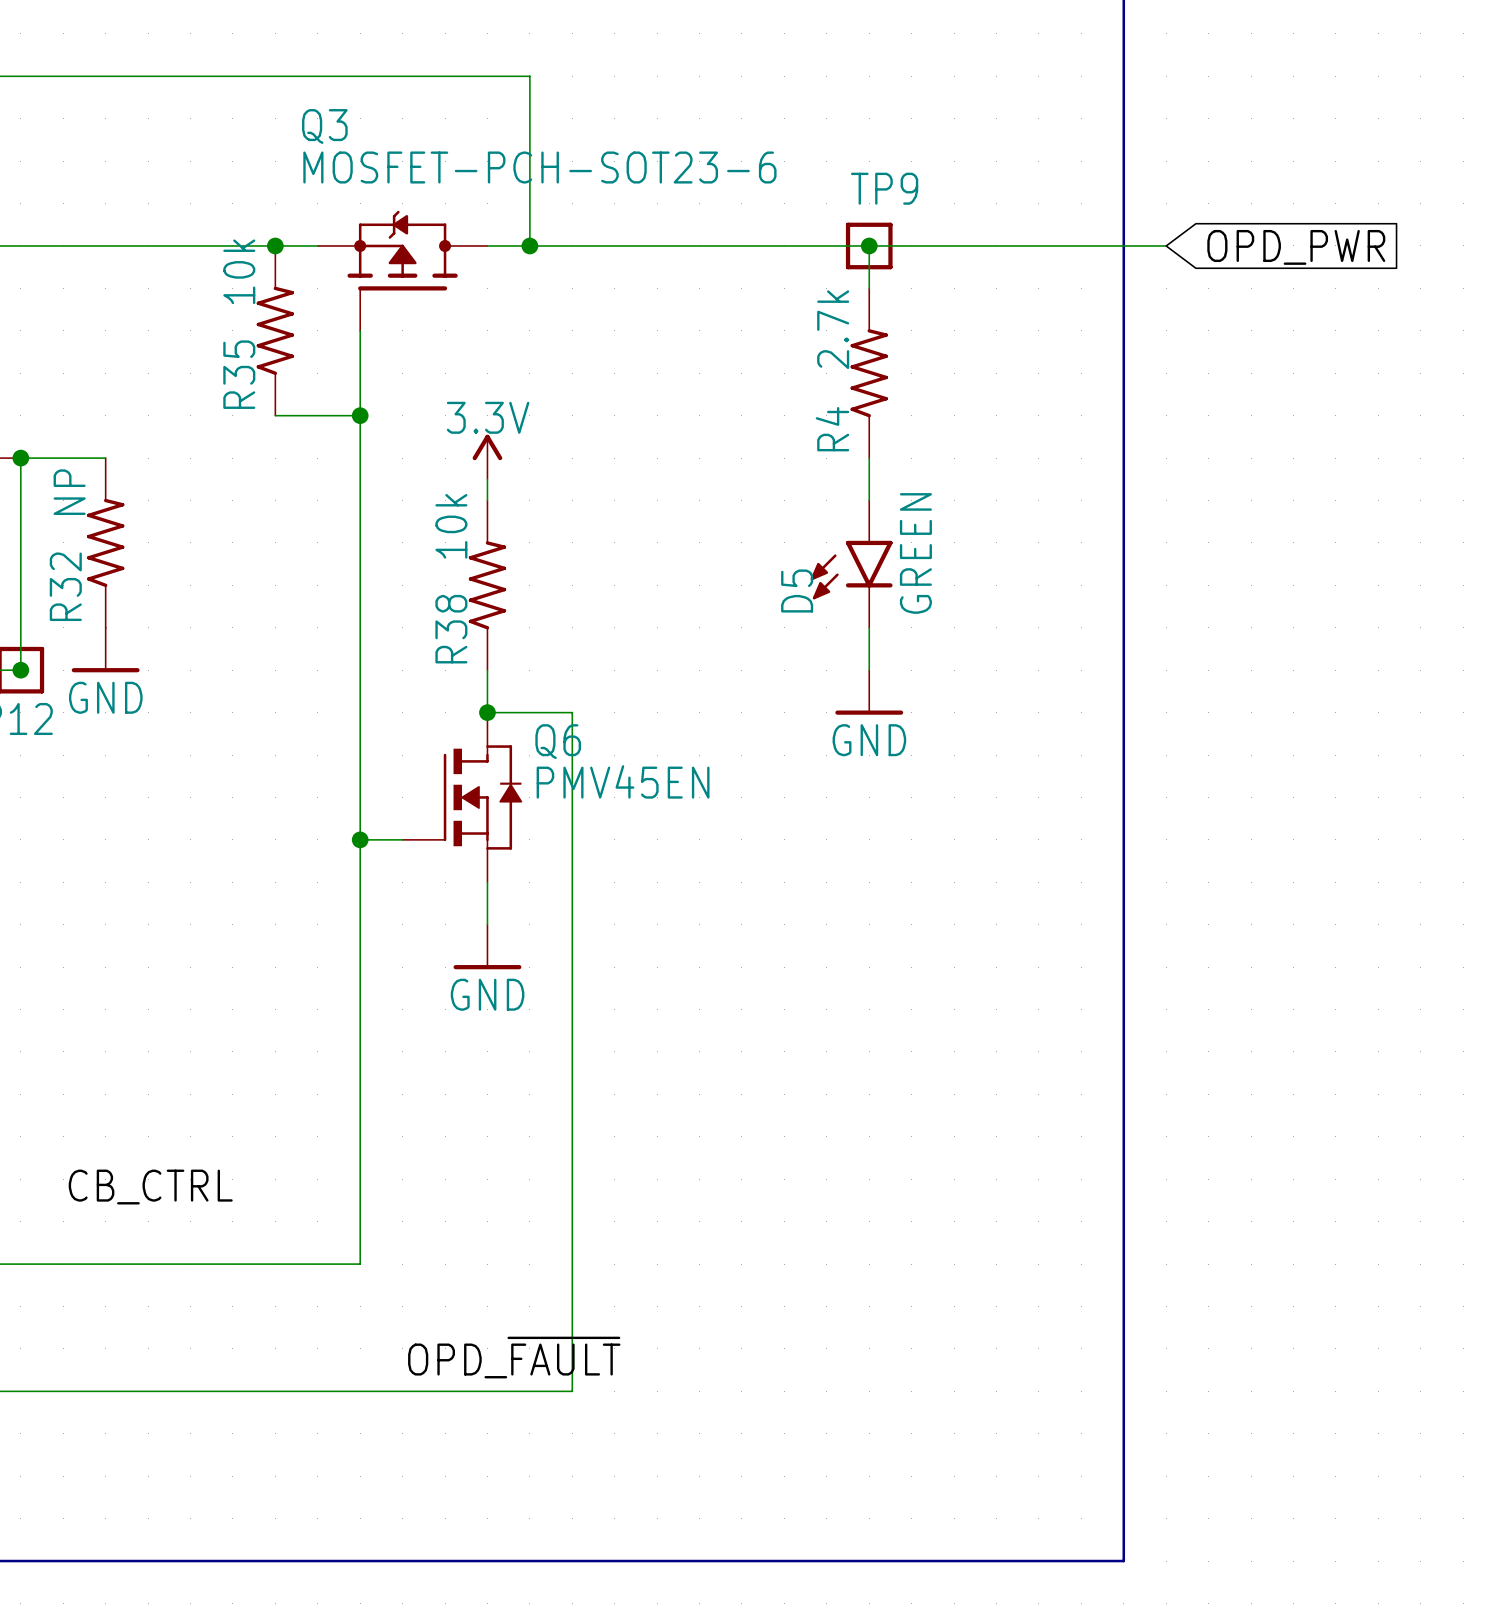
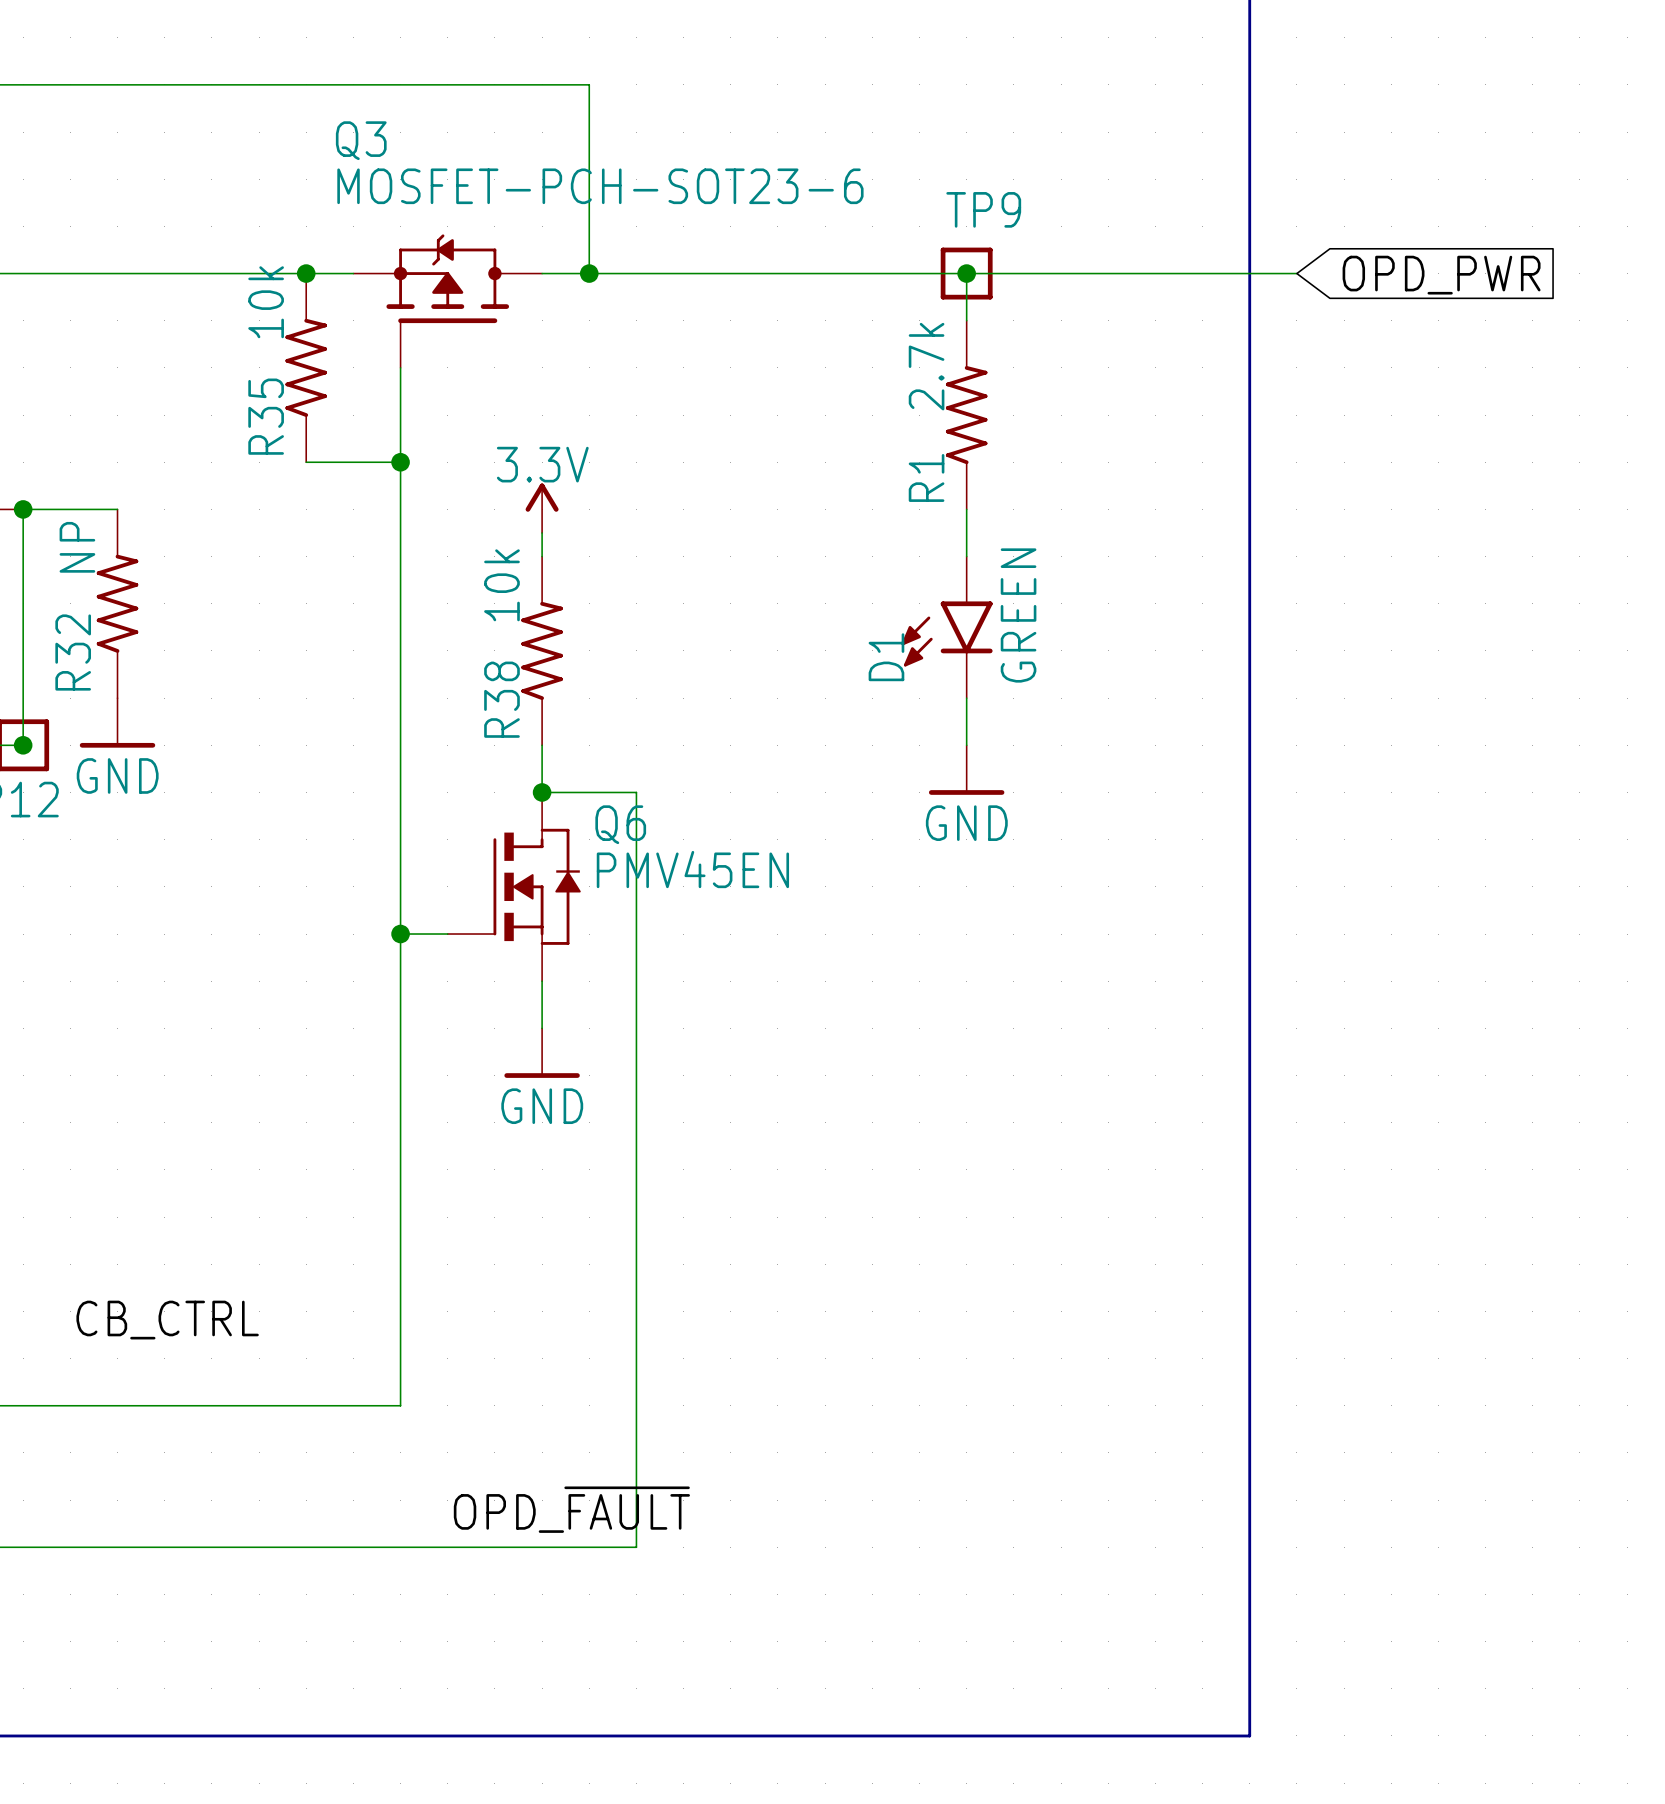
R4 name: R4 (832, 429) -> R1 (926, 477)
D5 name: D5 (797, 591) -> D1 (886, 657)

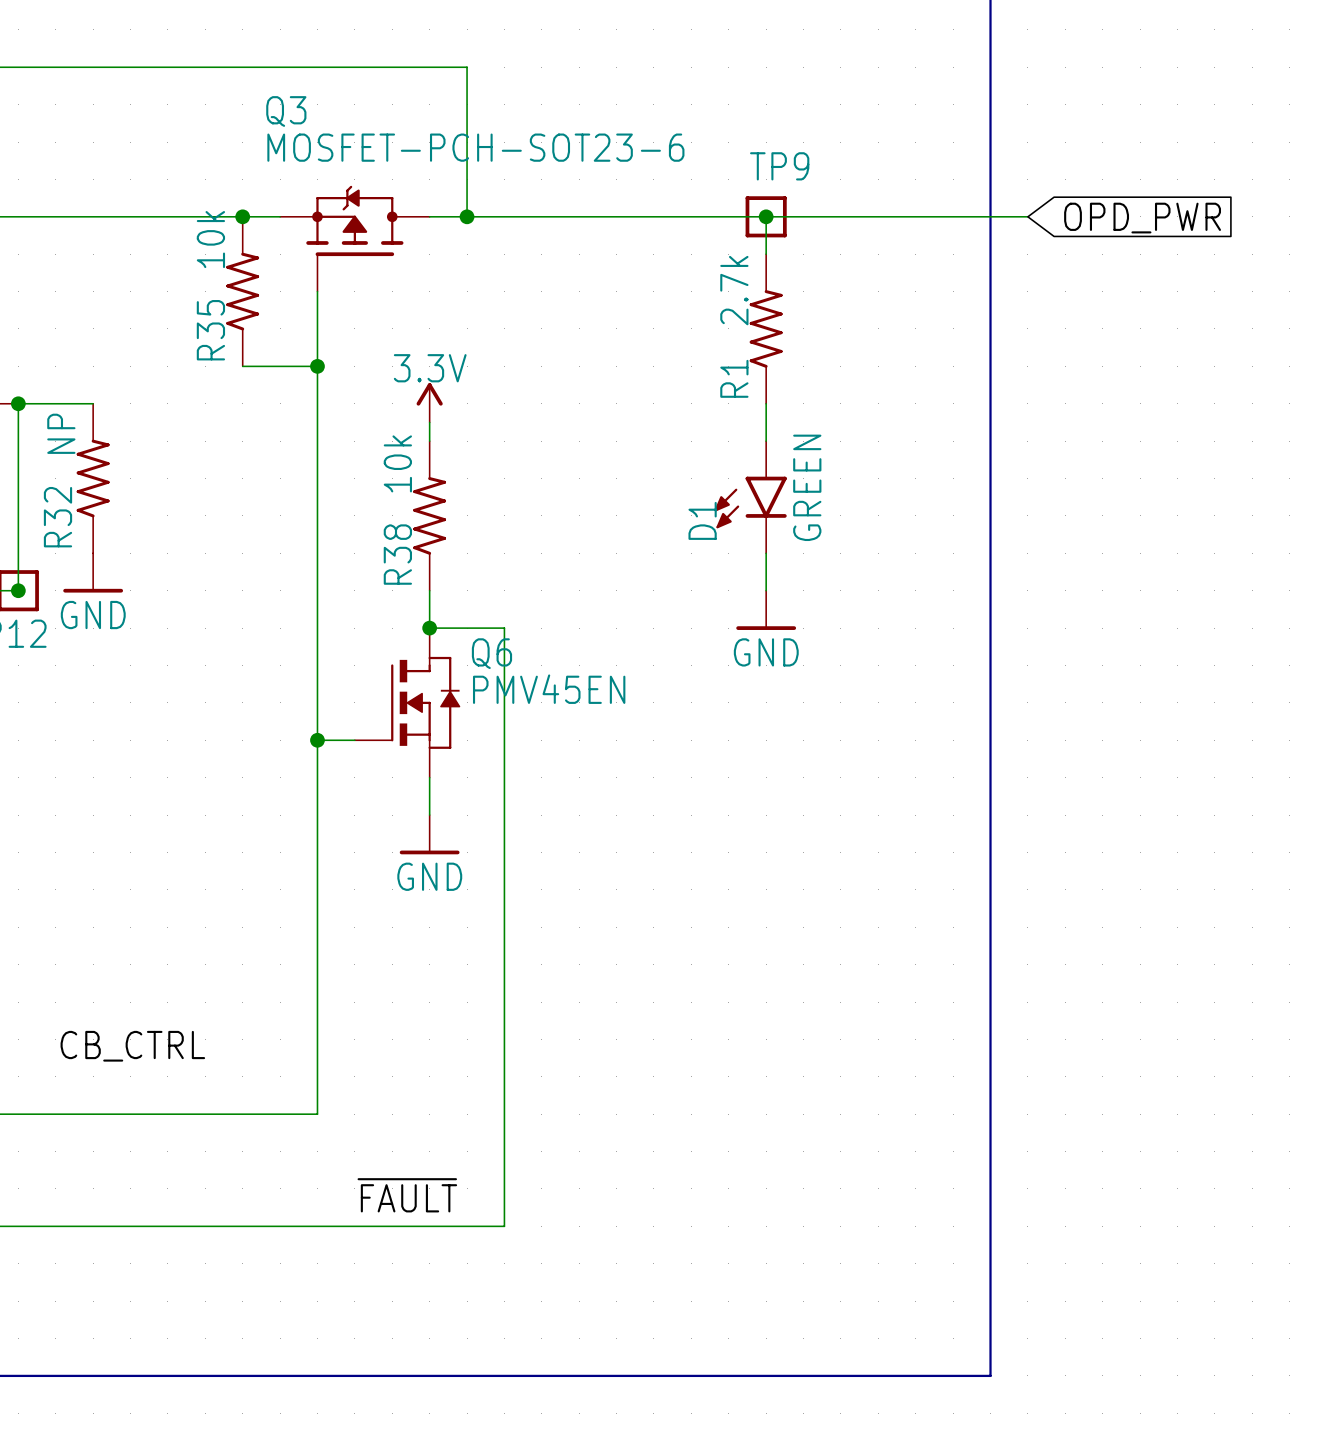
label: OPD_~{FAULT} (571, 1509) -> ~{FAULT} (407, 1195)

